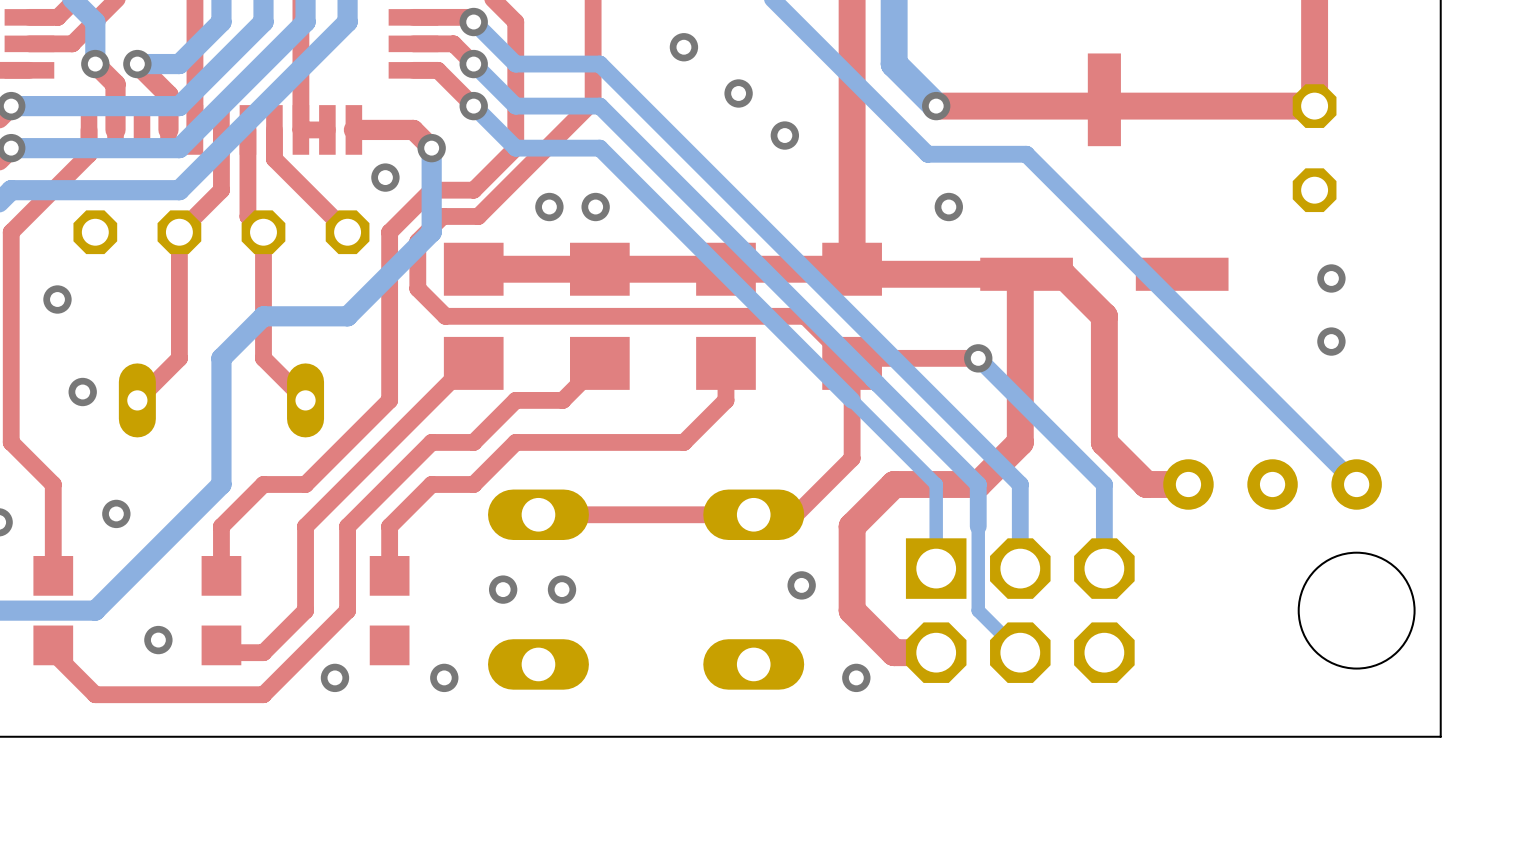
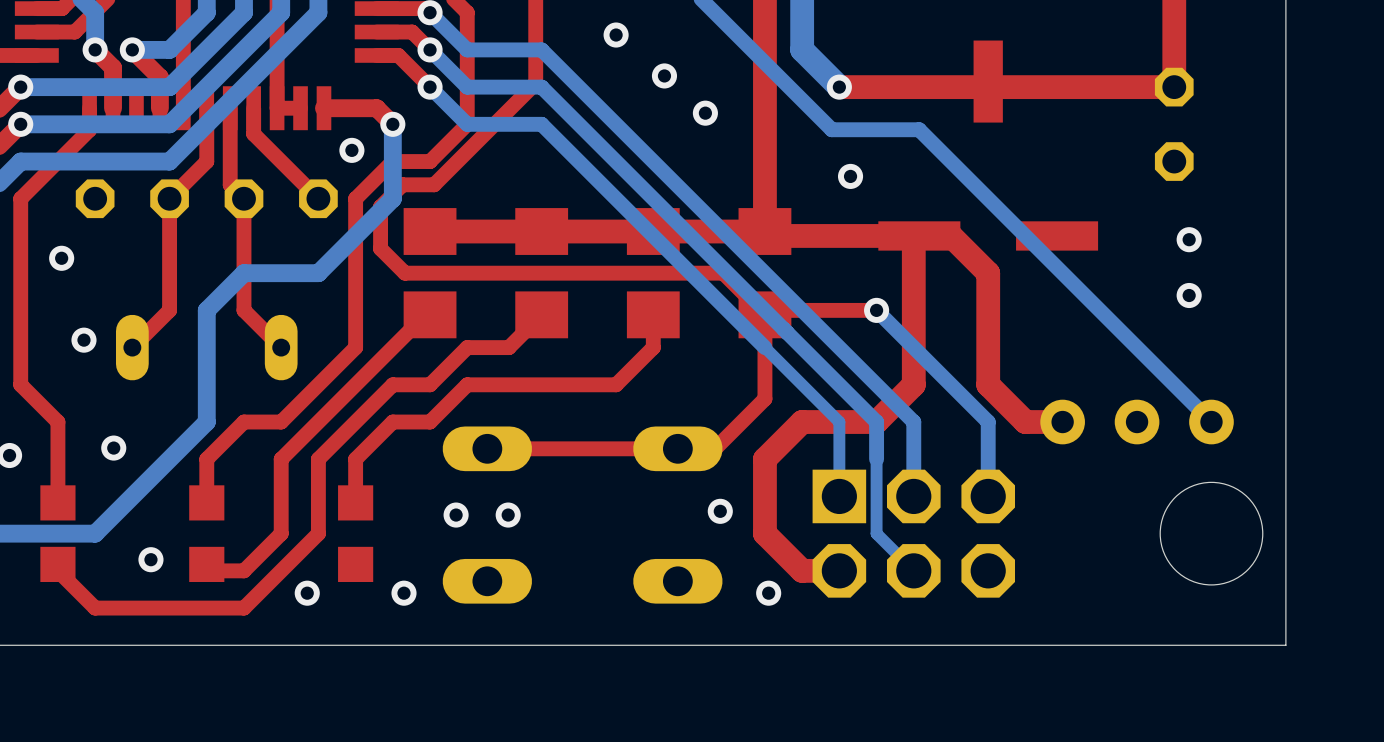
via: (549, 207) -> none
via: (595, 207) -> none

